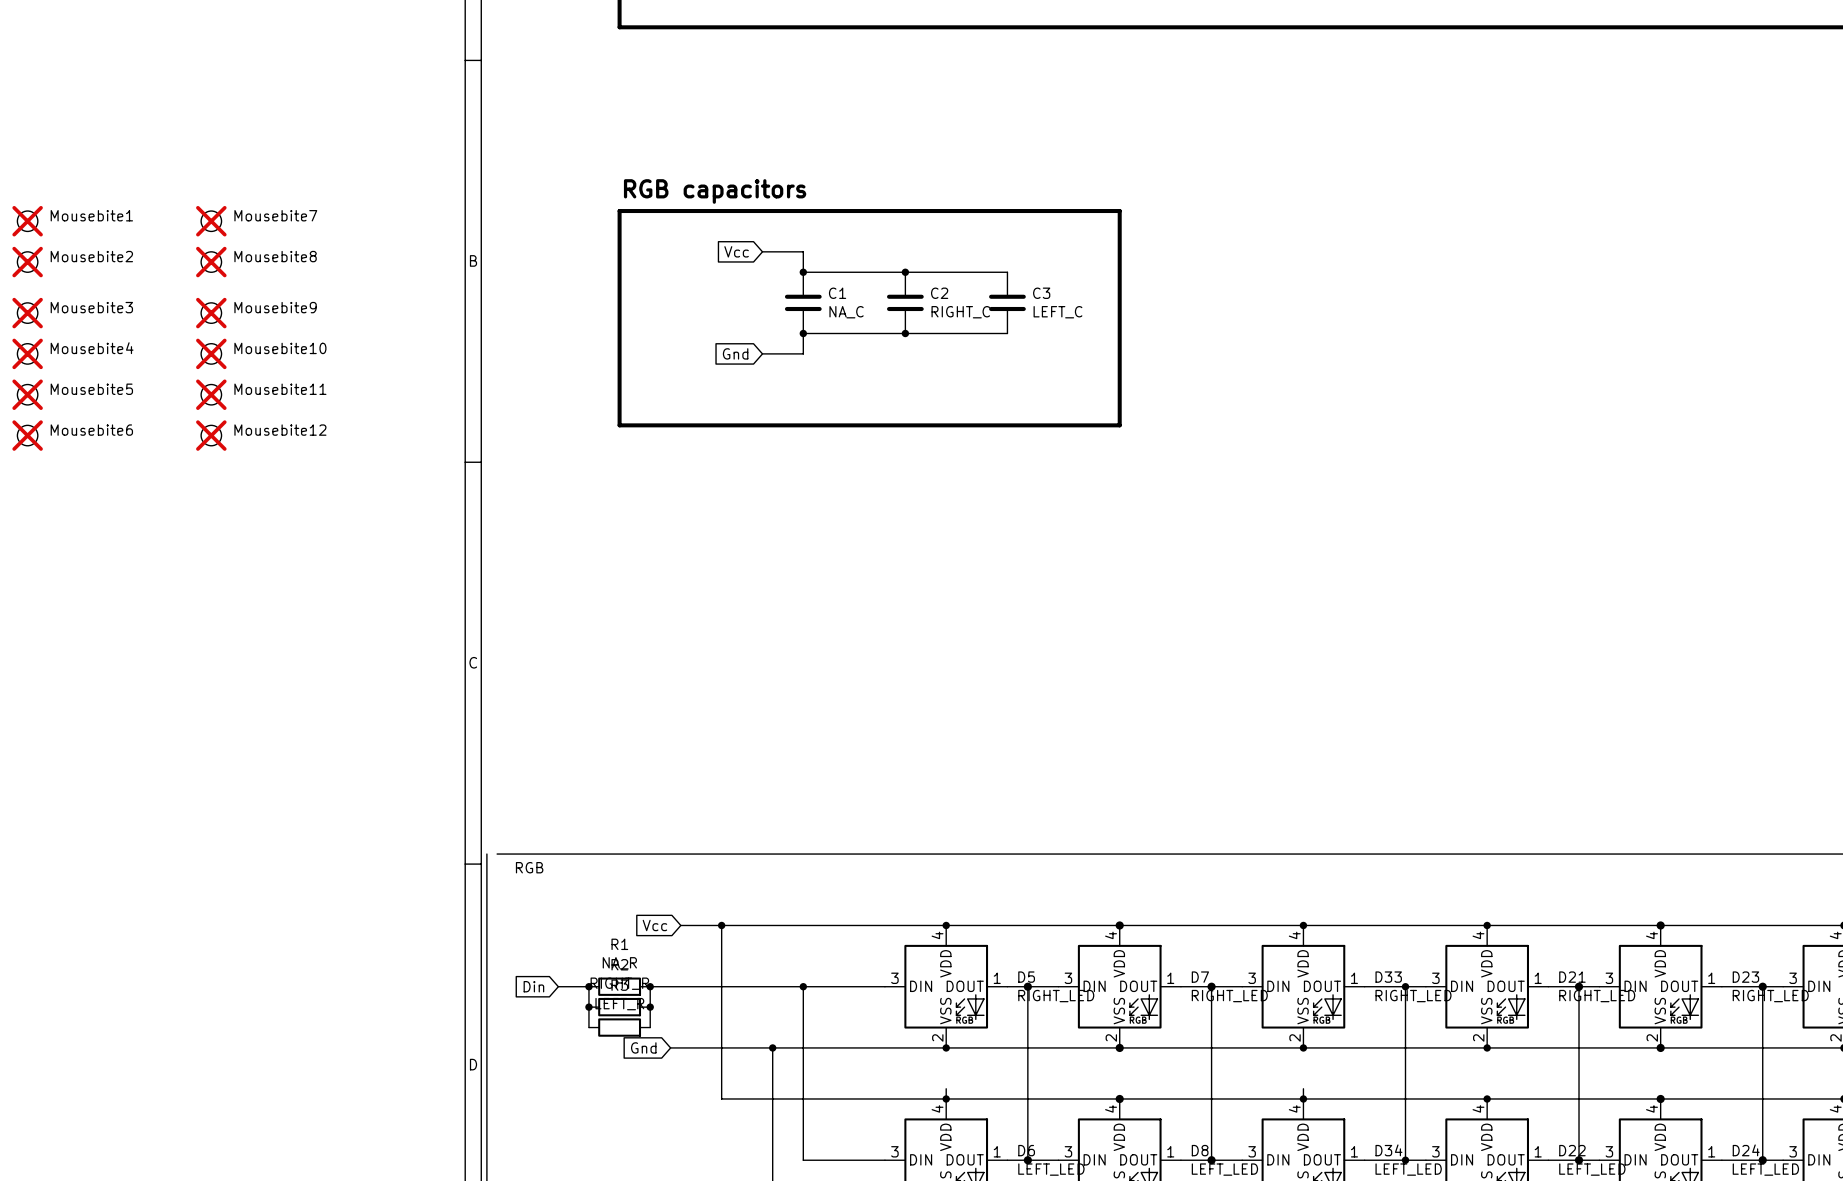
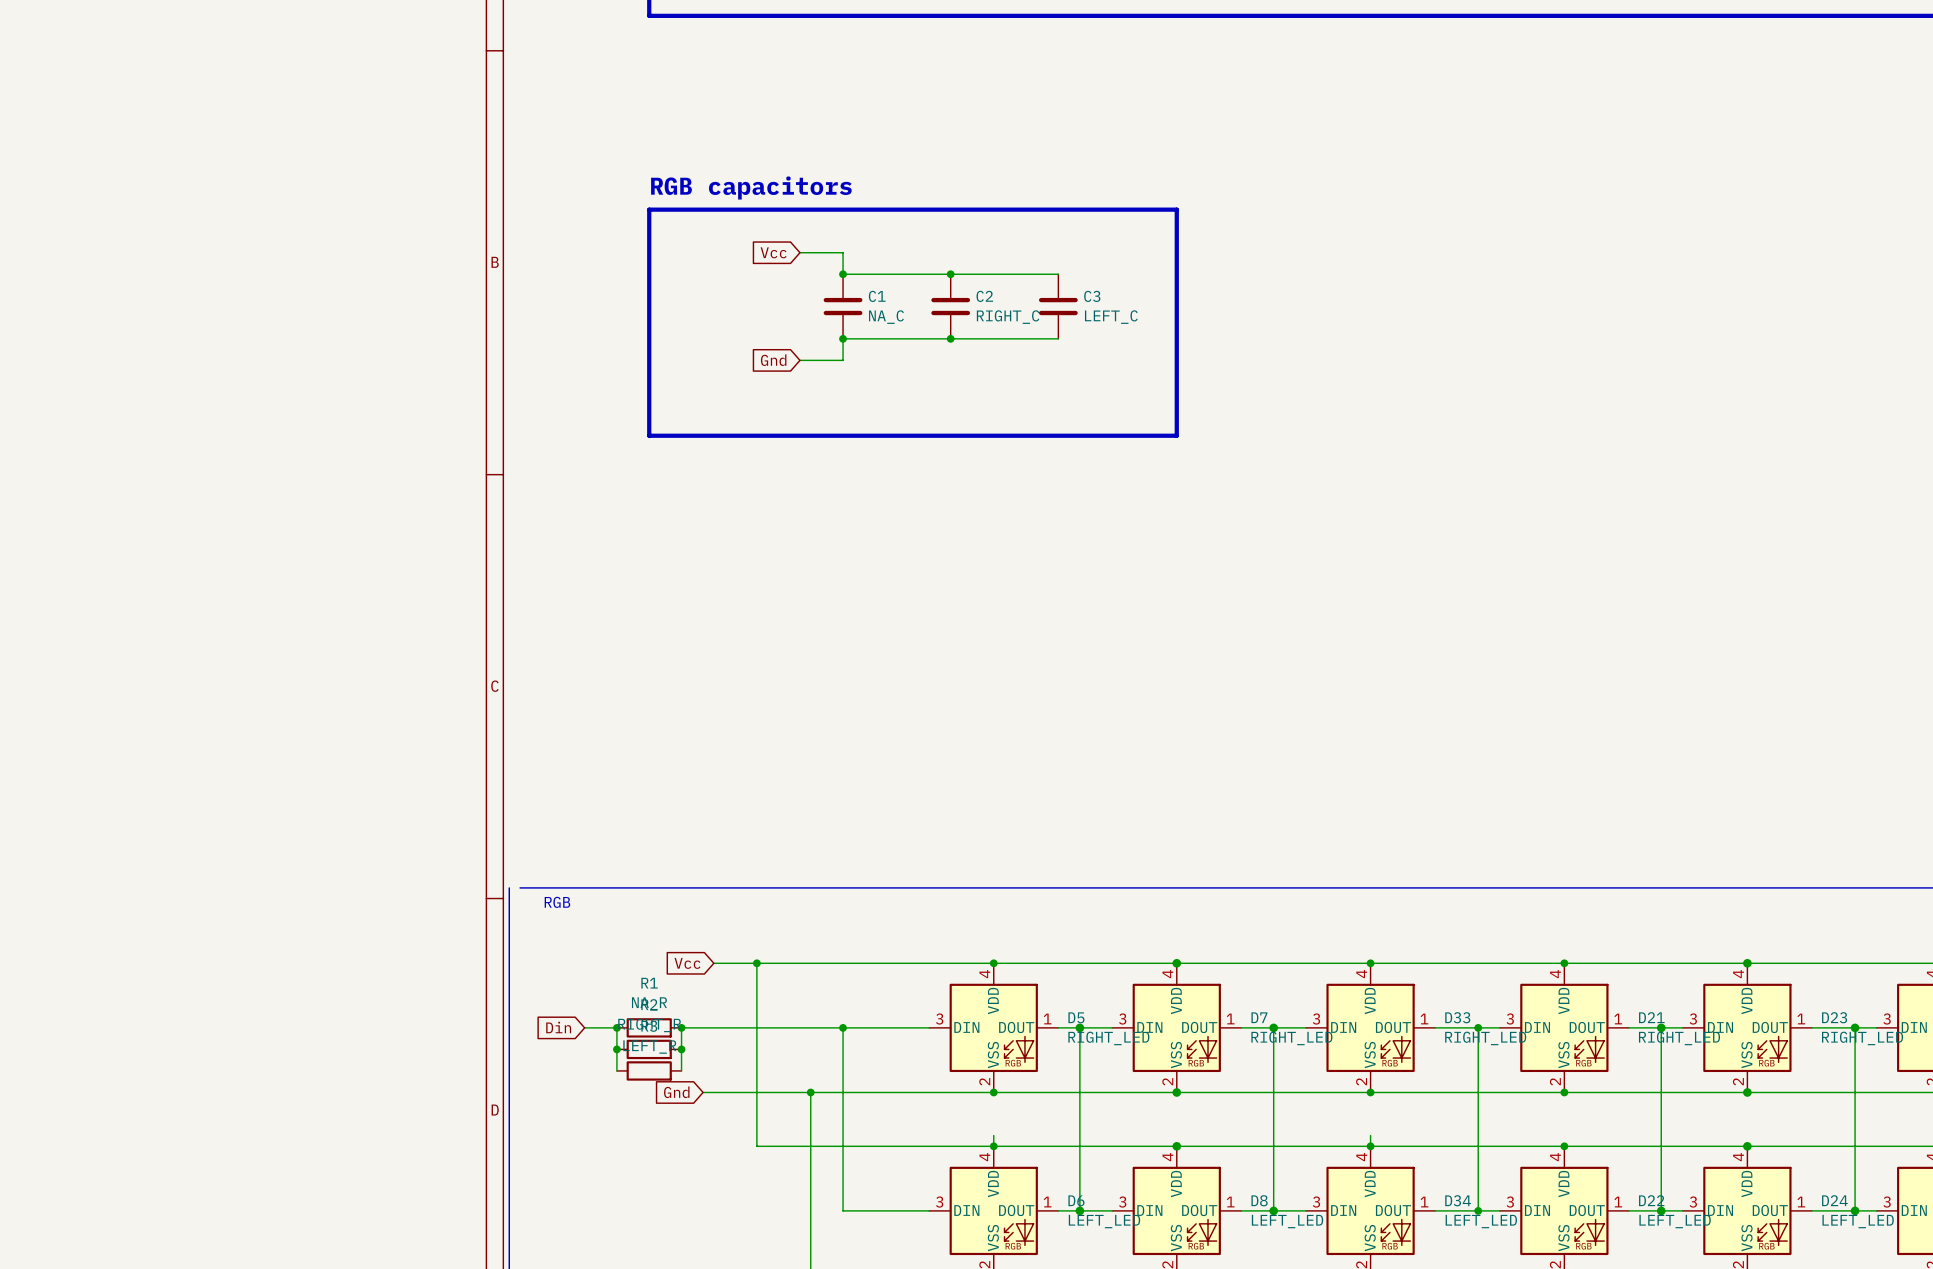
Mousebite1: (27, 221) -> none
Mousebite7: (211, 221) -> none
Mousebite2: (27, 262) -> none
Mousebite8: (211, 262) -> none
Mousebite3: (27, 313) -> none
Mousebite9: (211, 313) -> none
Mousebite4: (27, 353) -> none
Mousebite10: (211, 353) -> none
Mousebite5: (27, 394) -> none
Mousebite11: (211, 394) -> none
Mousebite6: (27, 435) -> none
Mousebite12: (211, 435) -> none

